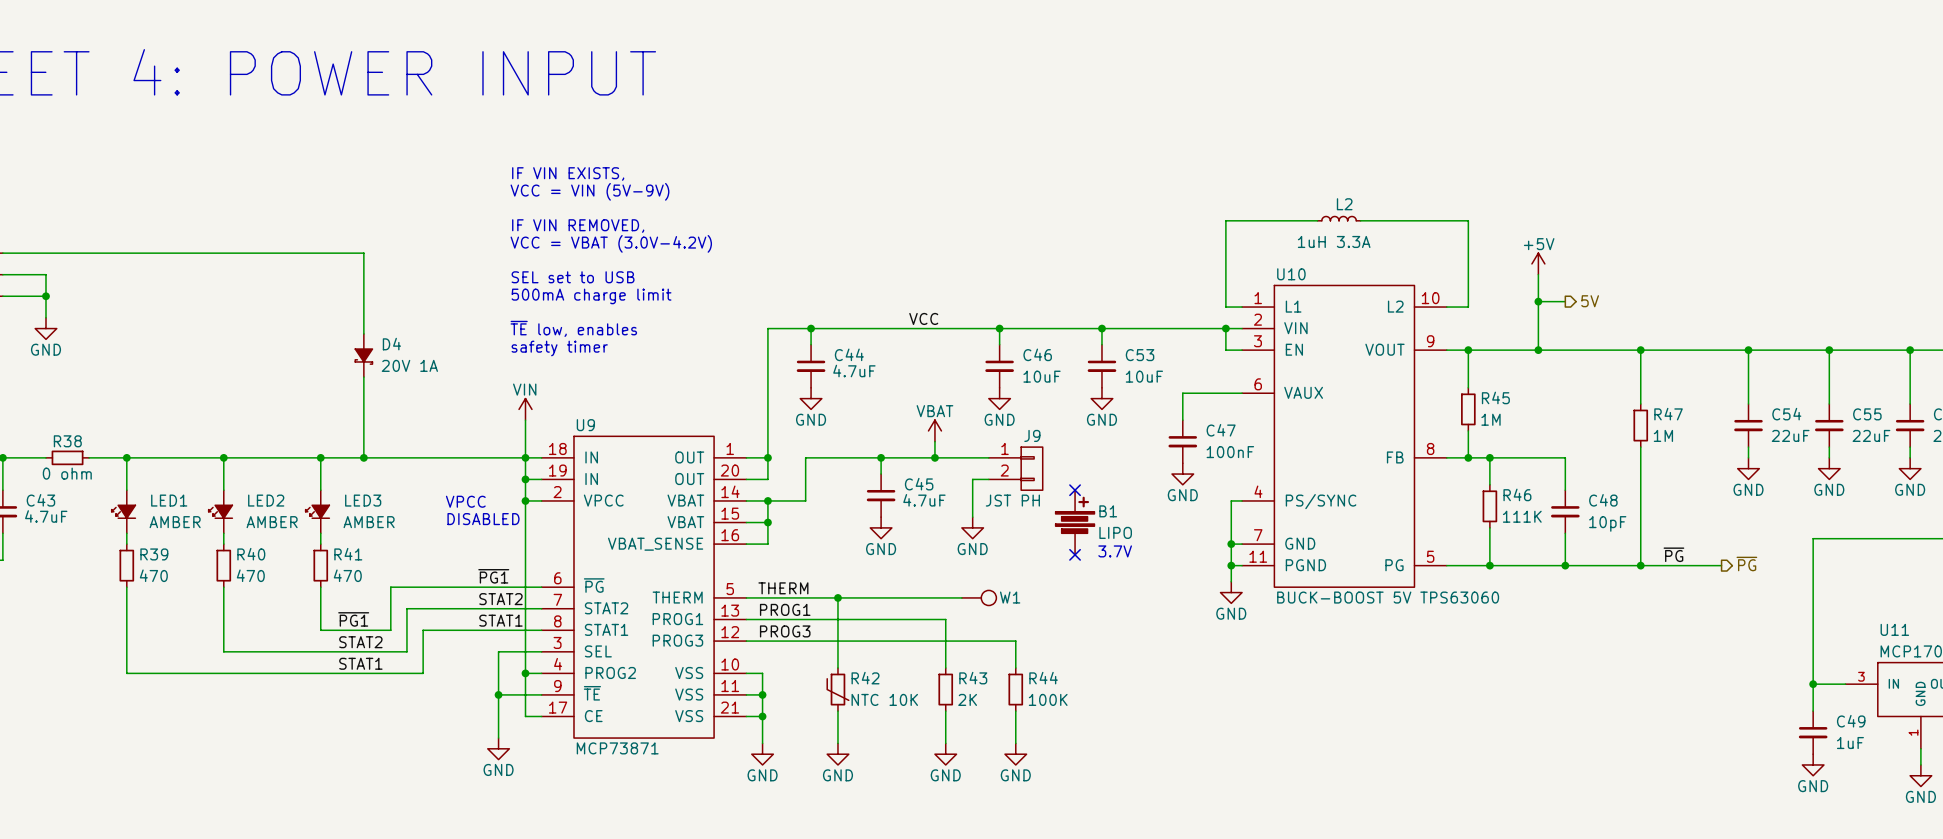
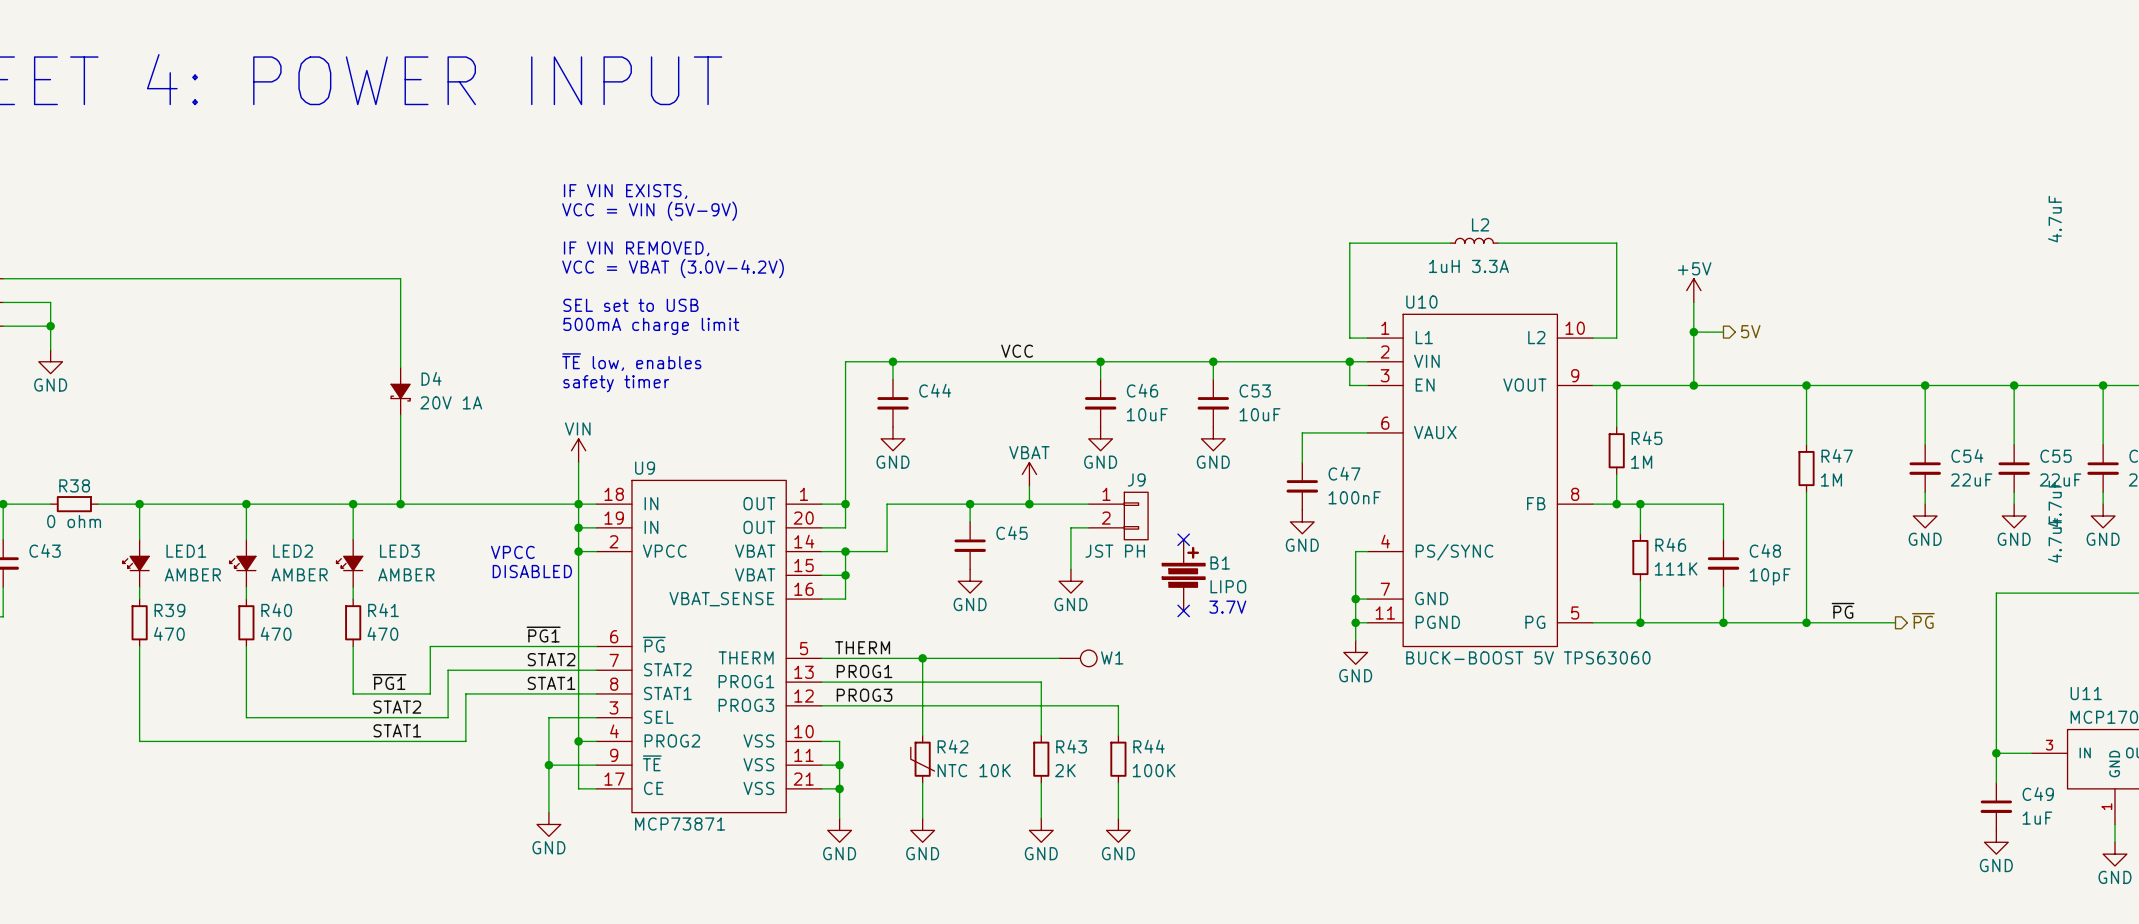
C44 value rotation: 0° (854, 371) -> 90° counterclockwise (2054, 219)
C44 value position: 4.7uF (854, 371) -> 4.7uF (2054, 219)
C45 value rotation: 0° (924, 500) -> 90° counterclockwise (2054, 503)
C45 value position: 4.7uF (924, 500) -> 4.7uF (2054, 503)
C43 value rotation: 0° (46, 516) -> 90° counterclockwise (2054, 539)
C43 value position: 4.7uF (46, 516) -> 4.7uF (2054, 539)

